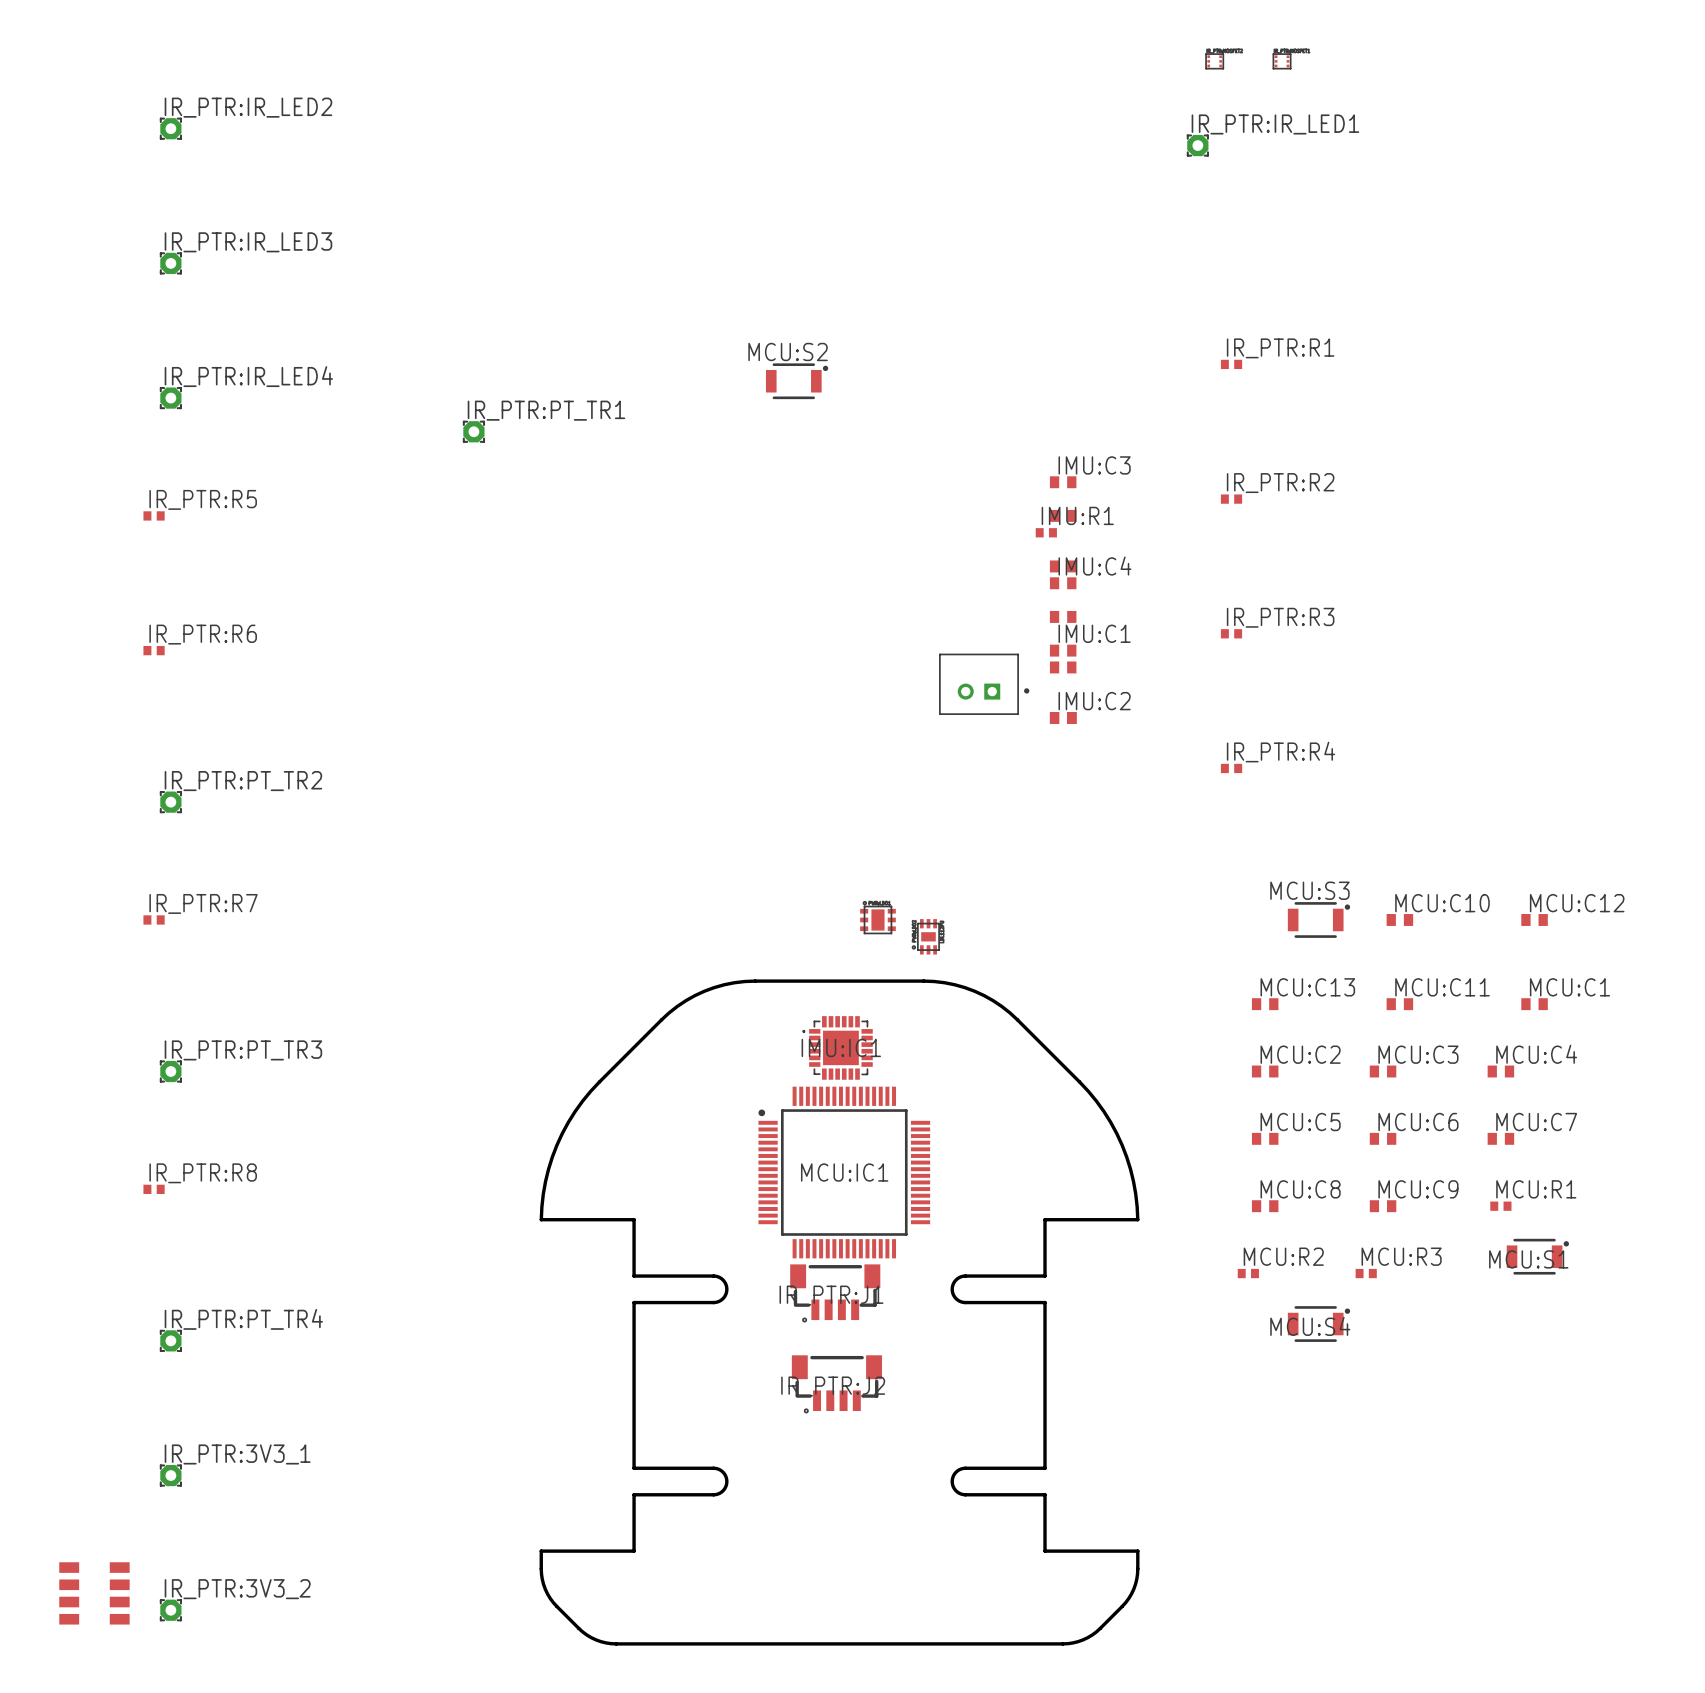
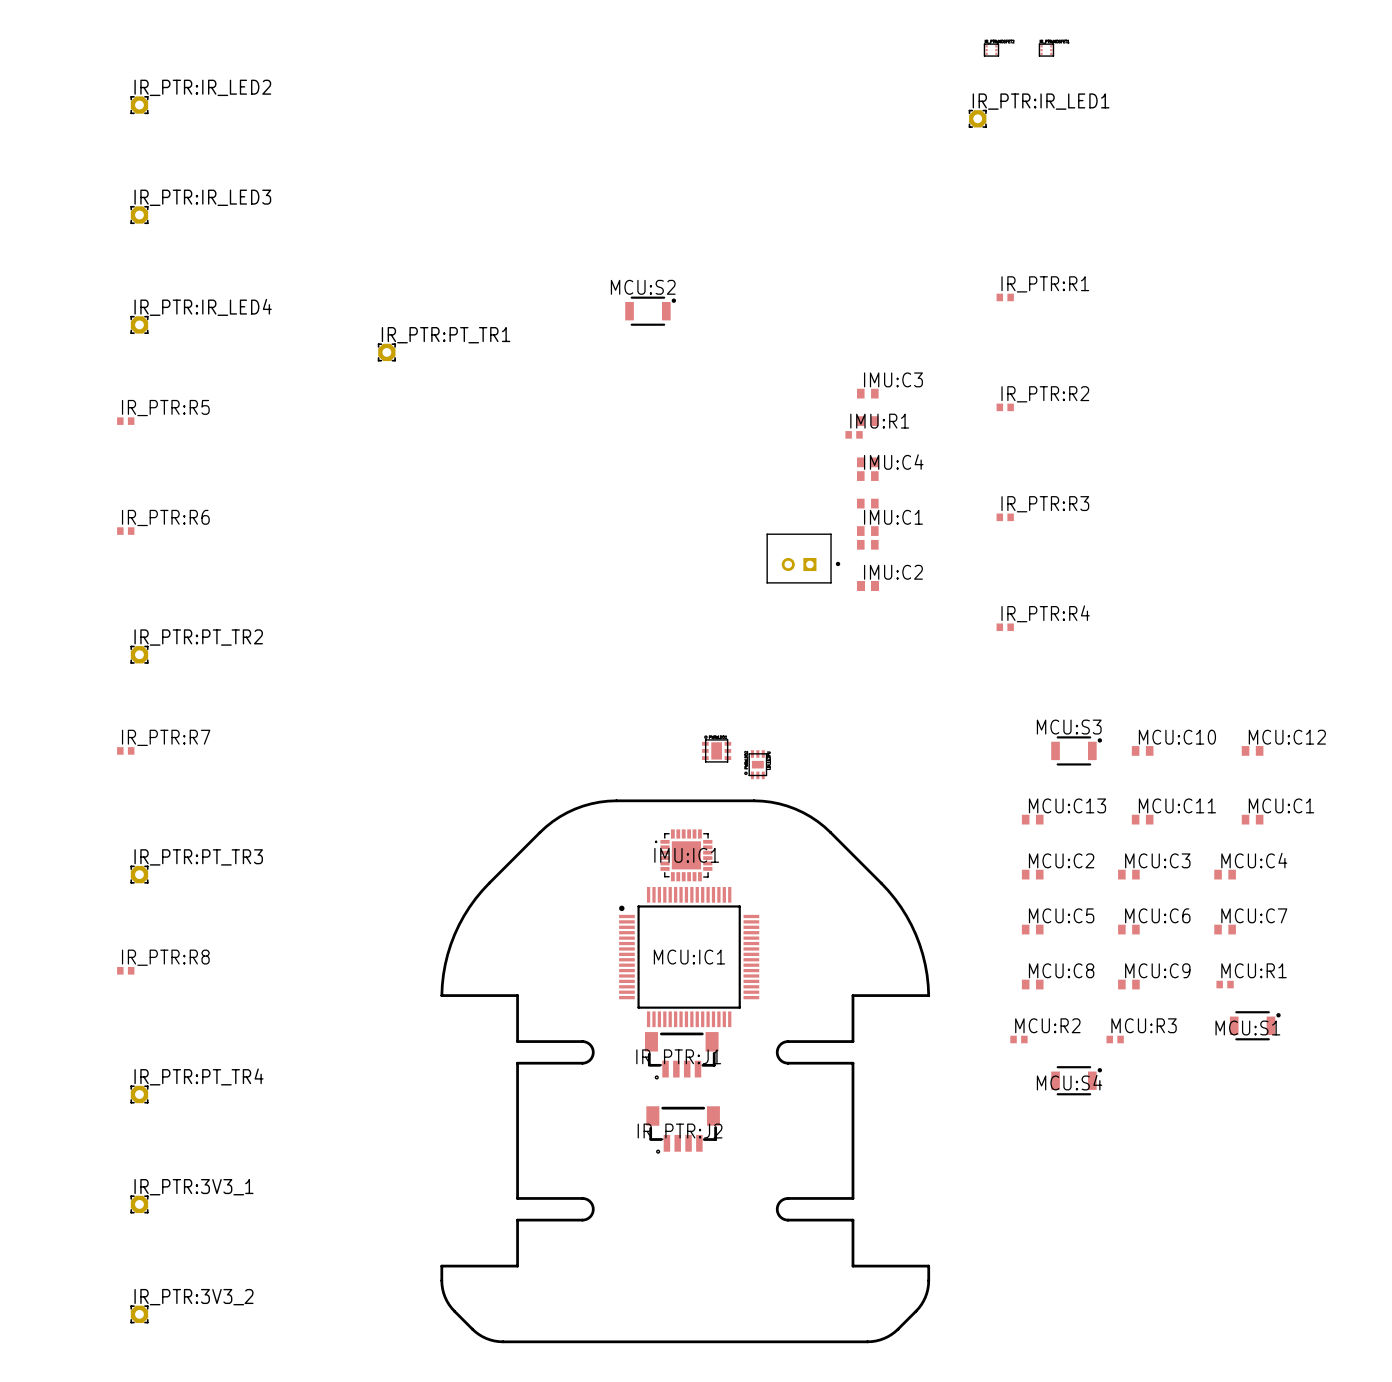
part: (69, 1593) -> none
part: (119, 1593) -> none

